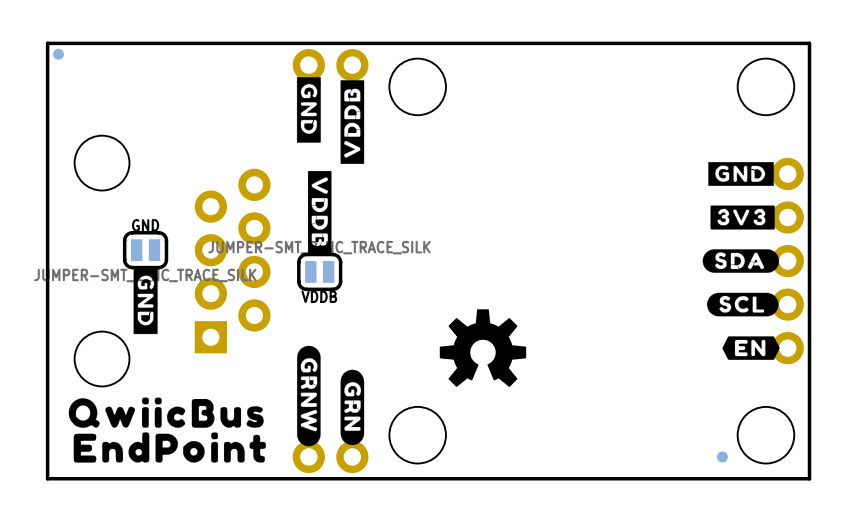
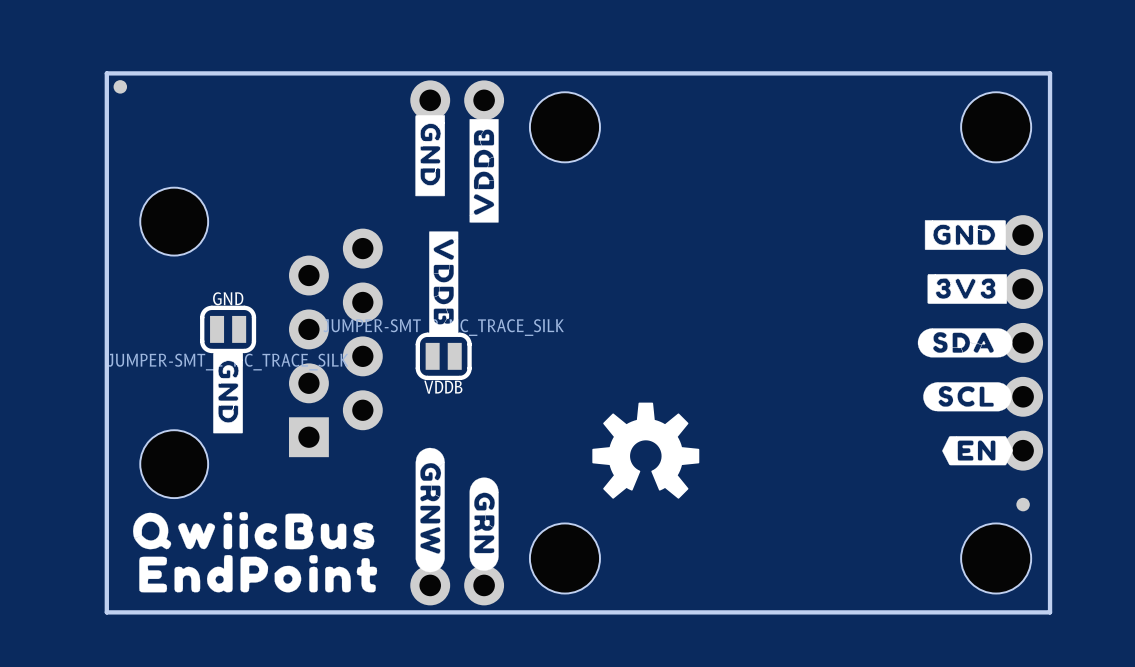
part position: (722, 456) -> (1023, 504)

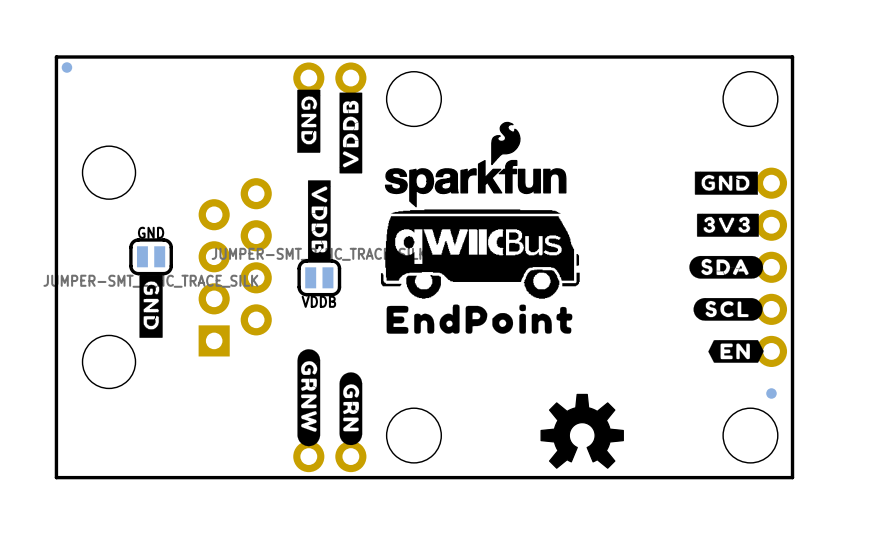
drawing: none -> [380, 121, 580, 299]
drawing position: (645, 450) -> (582, 431)
drawing: [133, 511, 375, 550] -> none
drawing position: (258, 573) -> (479, 319)

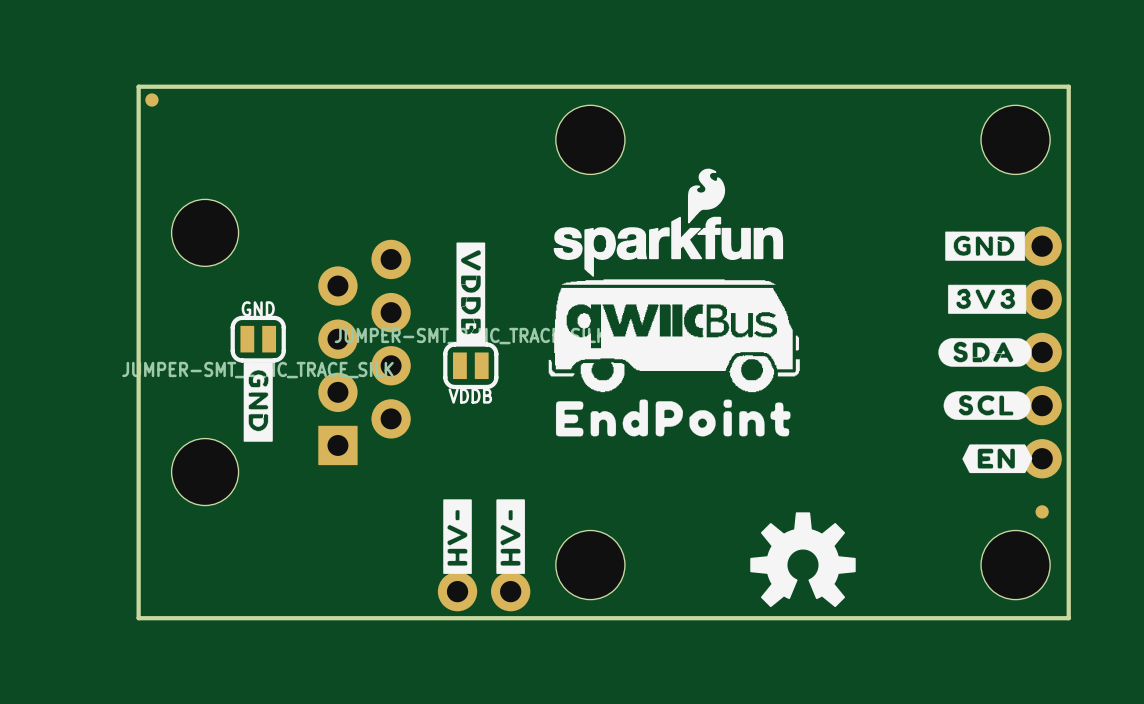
part: (329, 78) -> none
drawing: [297, 89, 363, 174] -> none
drawing shape: [297, 349, 321, 447] -> [443, 499, 472, 574]
drawing shape: [339, 372, 363, 446] -> [496, 499, 526, 574]

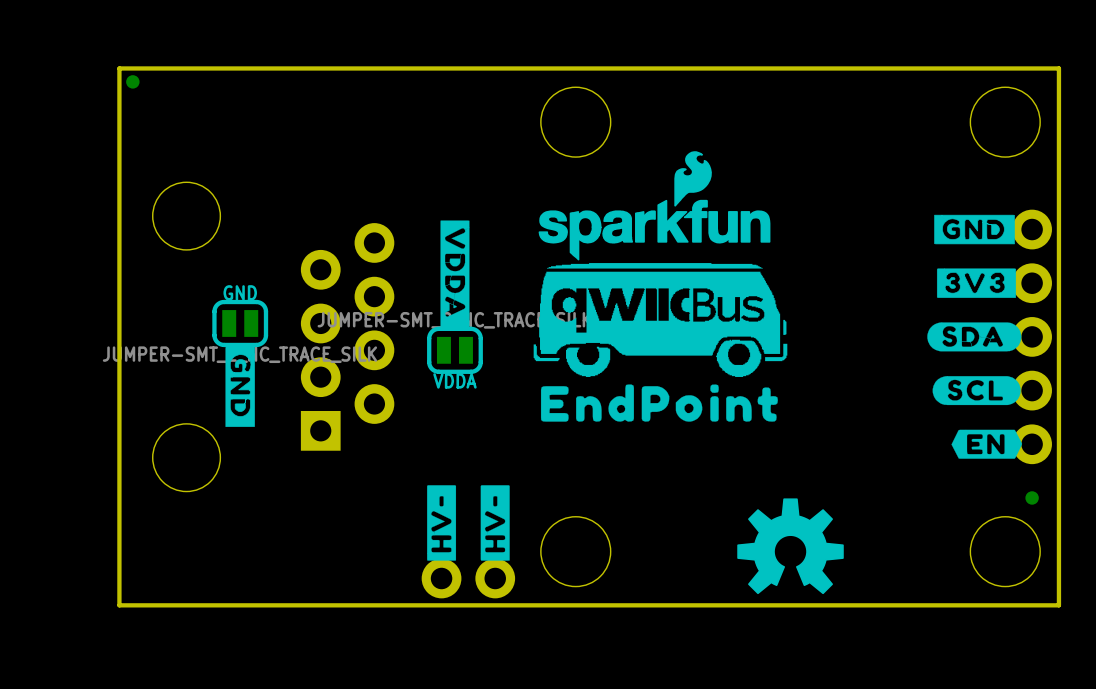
drawing shape: [456, 242, 486, 345] -> [440, 220, 470, 328]
VDDB name: VDDB (470, 396) -> VDDA (454, 380)

